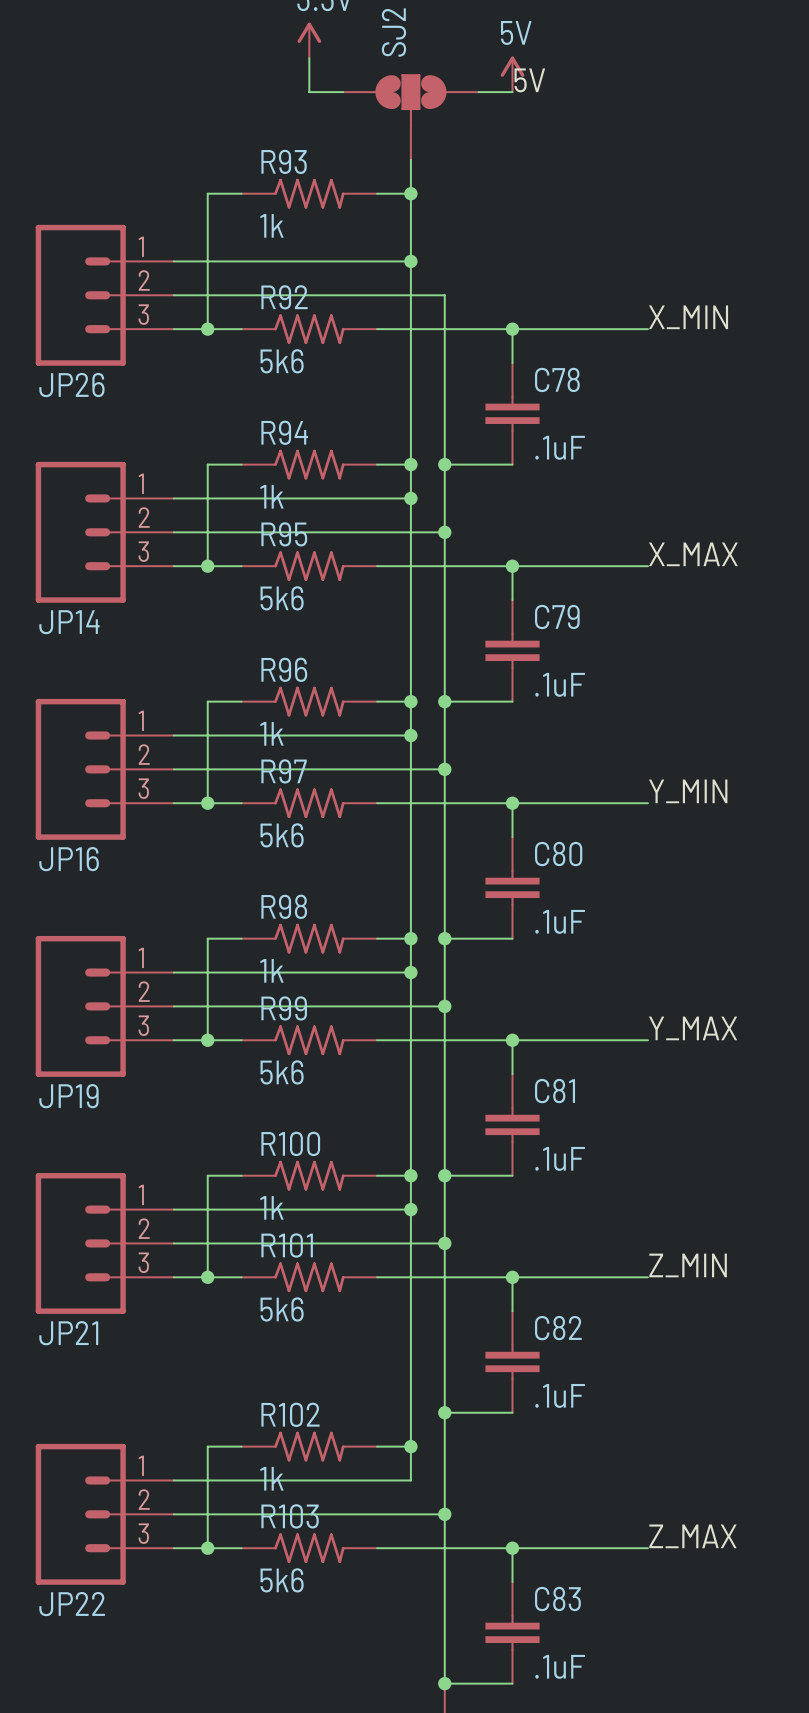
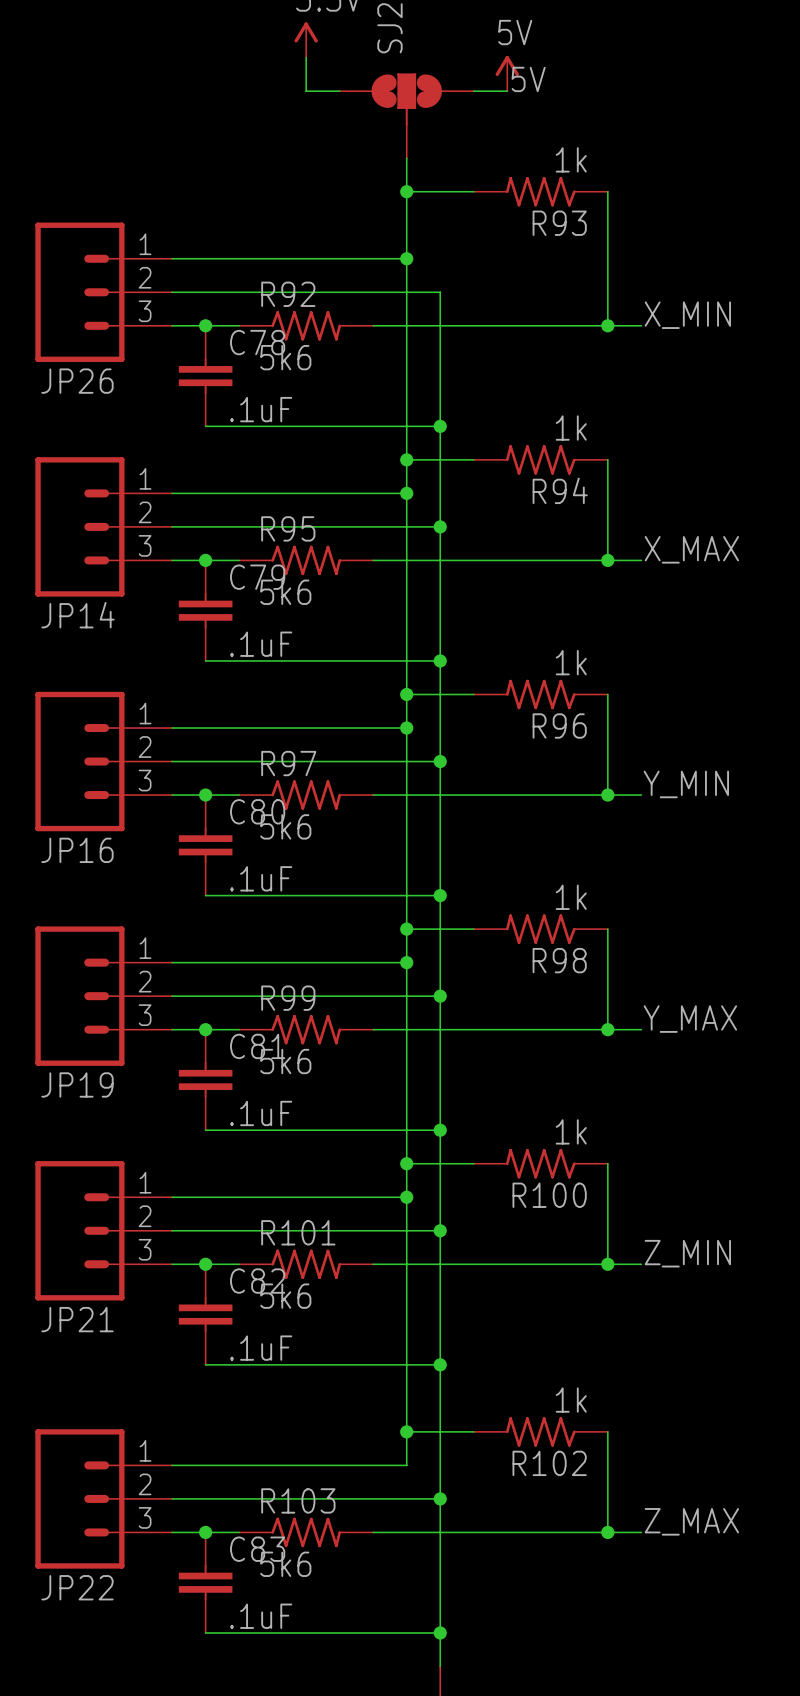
wire: (241, 193) (207, 193) (207, 329) -> none
R93 rotation: 0° (309, 193) -> 180° (540, 191)
R93 position: (309, 193) -> (540, 191)
wire: (377, 193) (410, 193) -> (473, 191) (406, 191)
wire: none -> (607, 191) (607, 325)
wire: (512, 329) (512, 363) -> none
junction: (512, 329) -> none
junction: none -> (607, 325)
C78 position: (512, 413) -> (205, 376)
wire: none -> (205, 426) (440, 426)
wire: (241, 464) (207, 464) (207, 566) -> none
R94 rotation: 0° (309, 464) -> 180° (540, 459)
R94 position: (309, 464) -> (540, 459)
wire: (377, 464) (410, 464) -> (440, 459) (406, 459)
junction position: (444, 464) -> (440, 426)
wire: none -> (607, 459) (607, 560)
wire: (512, 566) (512, 600) -> none
junction: (512, 566) -> none
junction: none -> (607, 560)
C79 position: (512, 650) -> (205, 610)
wire: none -> (205, 660) (440, 660)
wire: (241, 701) (207, 701) (207, 803) -> none
R96 rotation: 0° (309, 701) -> 180° (540, 694)
R96 position: (309, 701) -> (540, 694)
wire: (377, 701) (410, 701) -> (440, 694) (406, 694)
junction position: (444, 701) -> (440, 660)
wire: none -> (607, 694) (607, 795)
wire: (512, 803) (512, 837) -> none
junction: (512, 803) -> none
junction: none -> (607, 795)
C80 position: (512, 887) -> (205, 845)
wire: none -> (205, 895) (440, 895)
wire: (241, 938) (207, 938) (207, 1040) -> none
R98 rotation: 0° (309, 938) -> 180° (540, 929)
R98 position: (309, 938) -> (540, 929)
wire: (377, 938) (410, 938) -> (440, 929) (406, 929)
junction position: (444, 938) -> (440, 895)
wire: none -> (607, 929) (607, 1029)
wire: (512, 1040) (512, 1074) -> none
junction: (512, 1040) -> none
junction: none -> (607, 1029)
C81 position: (512, 1124) -> (205, 1079)
wire: none -> (205, 1130) (440, 1130)
wire: (241, 1175) (207, 1175) (207, 1277) -> none
R100 rotation: 0° (309, 1175) -> 180° (540, 1163)
R100 position: (309, 1175) -> (540, 1163)
wire: (377, 1175) (410, 1175) -> (440, 1163) (406, 1163)
junction position: (444, 1175) -> (440, 1130)
wire: none -> (607, 1163) (607, 1264)
wire: (512, 1277) (512, 1311) -> none
junction: (512, 1277) -> none
junction: none -> (607, 1264)
C82 position: (512, 1361) -> (205, 1314)
wire: none -> (205, 1364) (440, 1364)
wire: (444, 1412) (512, 1412) -> none
junction position: (444, 1412) -> (440, 1364)
wire: (241, 1446) (207, 1446) (207, 1548) -> none
R102 rotation: 0° (309, 1446) -> 180° (540, 1431)
R102 position: (309, 1446) -> (540, 1431)
wire: (377, 1446) (410, 1446) -> (473, 1431) (406, 1431)
wire: none -> (607, 1431) (607, 1532)
wire: (512, 1548) (512, 1582) -> none
junction: (512, 1548) -> none
junction: none -> (607, 1532)
C83 position: (512, 1632) -> (205, 1582)
wire: none -> (205, 1632) (440, 1632)
wire: (444, 1683) (512, 1683) -> none
junction position: (444, 1683) -> (440, 1632)

